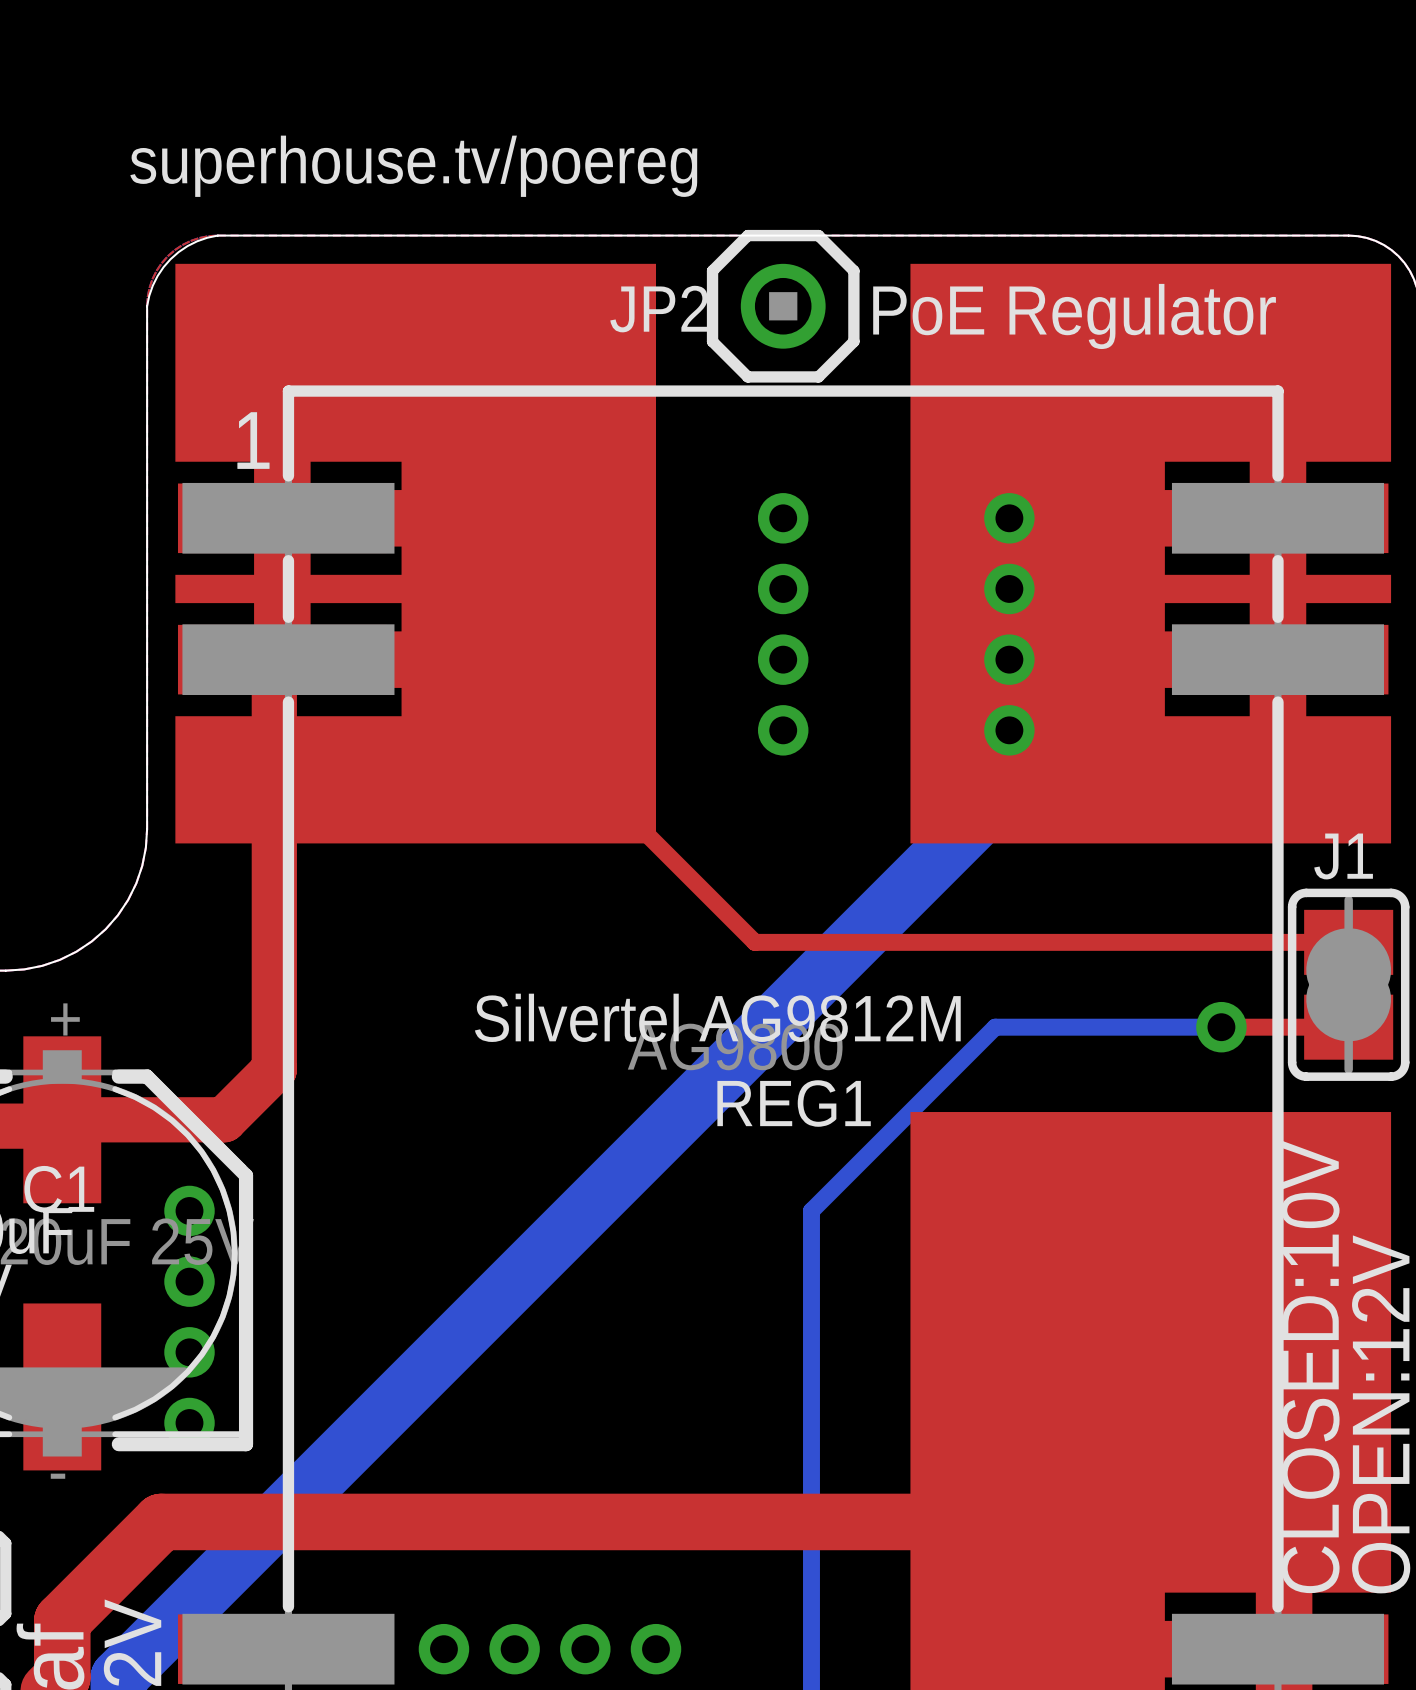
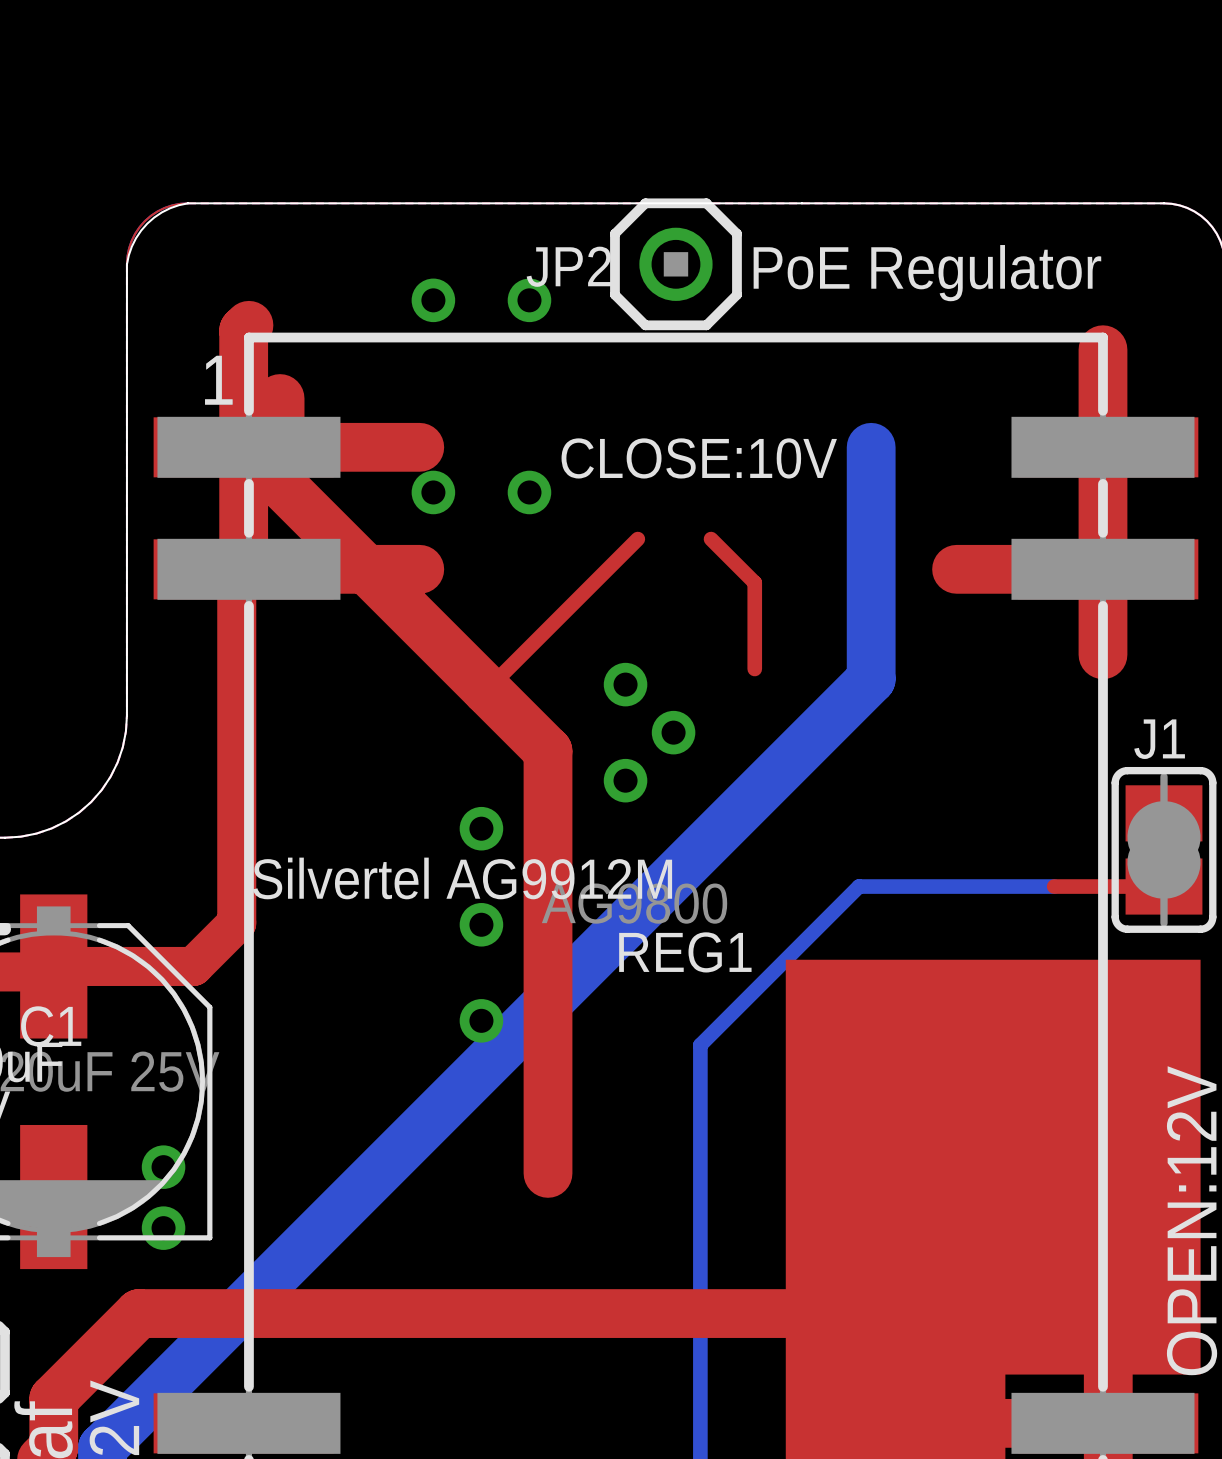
text: superhouse.tv/poereg (413, 166) -> none
drawing: [175, 263, 656, 844] -> none
drawing: [910, 263, 1392, 844] -> none
via: none -> (433, 300)
via: none -> (529, 300)
top track: none -> (280, 398) (280, 483) (548, 751) (548, 1173)
via: (783, 518) -> none
via: (1009, 518) -> none
text: none -> CLOSE:10V (699, 458)
via: none -> (433, 492)
via: none -> (529, 492)
via: (783, 588) -> none
via: (1009, 588) -> none
top track: none -> (637, 539) (486, 690)
top track: none -> (711, 539) (754, 582) (754, 669)
via: (783, 659) -> none
via: (1009, 659) -> none
via: (783, 730) -> none
via: (1009, 730) -> none
top track: (274, 786) (599, 786) (754, 942) (1348, 942) -> none
via: none -> (625, 684)
via: none -> (673, 732)
via: none -> (625, 780)
via: none -> (481, 828)
text: Silvertel AG9812M (717, 1017) -> Silvertel AG9912M (462, 878)
text: + (65, 1019) -> none
via: (1221, 1027) -> none
via: none -> (481, 924)
line: (118, 1076) (147, 1076) (246, 1175) (246, 1444) (118, 1444) -> none
via: none -> (481, 1020)
via: (189, 1210) -> none
via: (189, 1281) -> none
text: CLOSED:10V (1310, 1366) -> none
text: - (57, 1476) -> none
via: (443, 1649) -> none
via: (514, 1649) -> none
via: (585, 1649) -> none
via: (655, 1649) -> none

